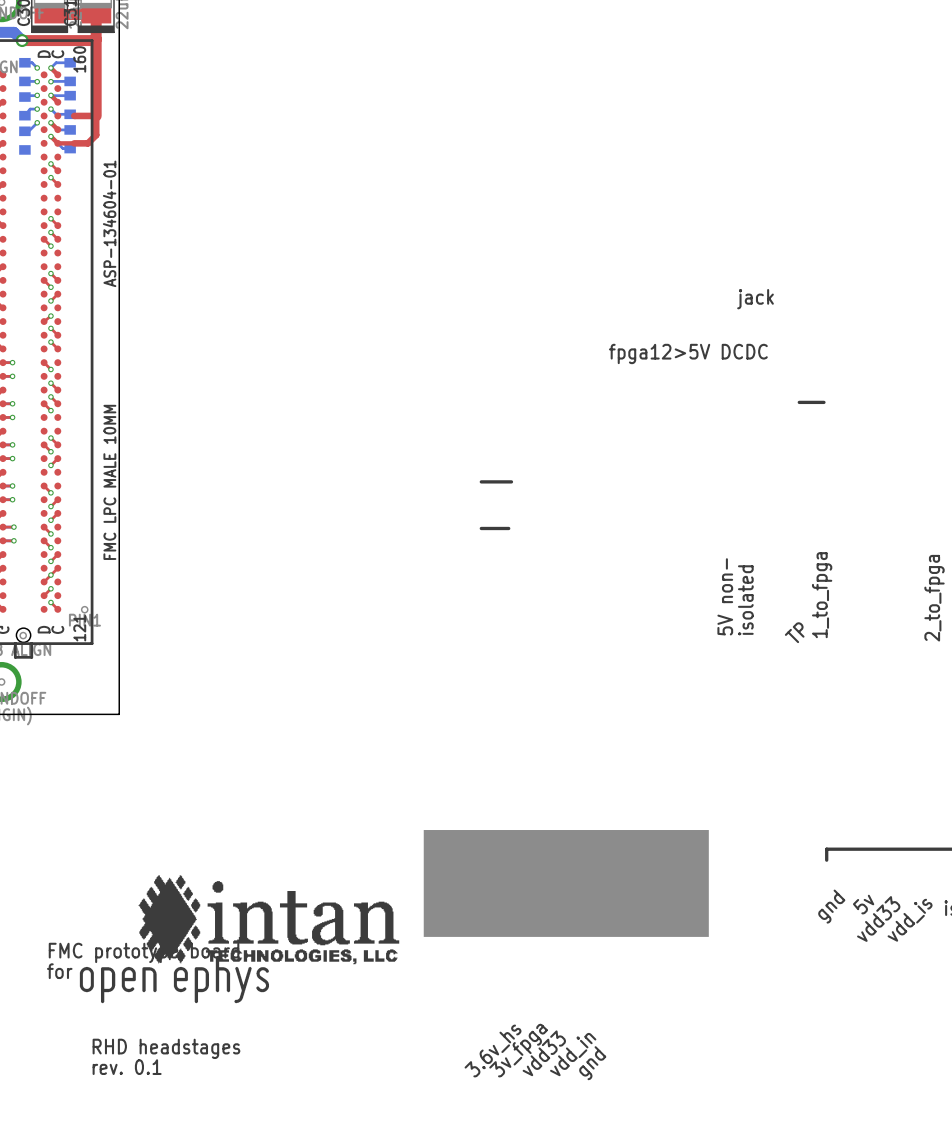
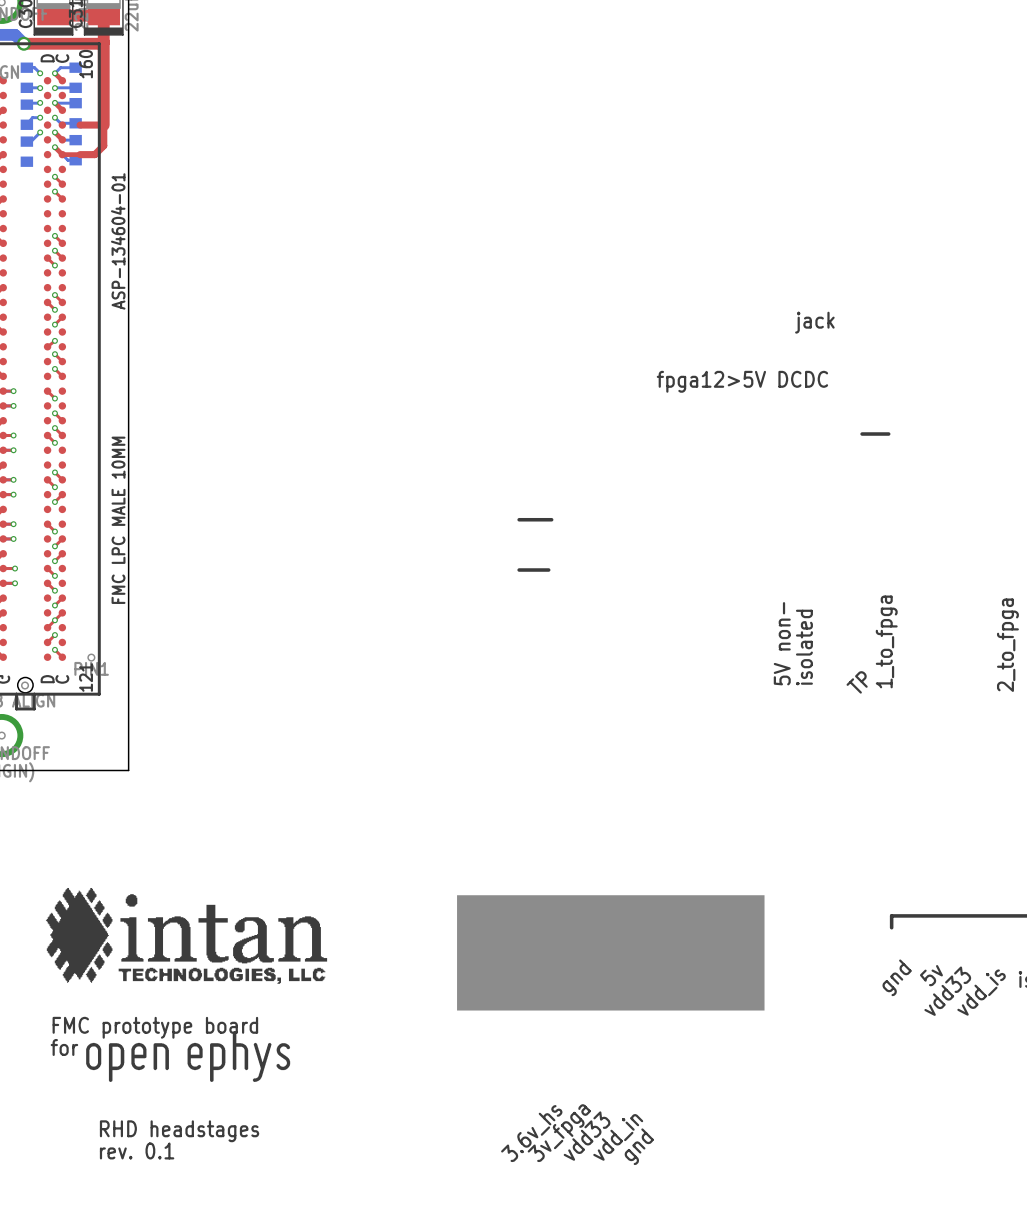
drawing position: (268, 919) -> (186, 935)

